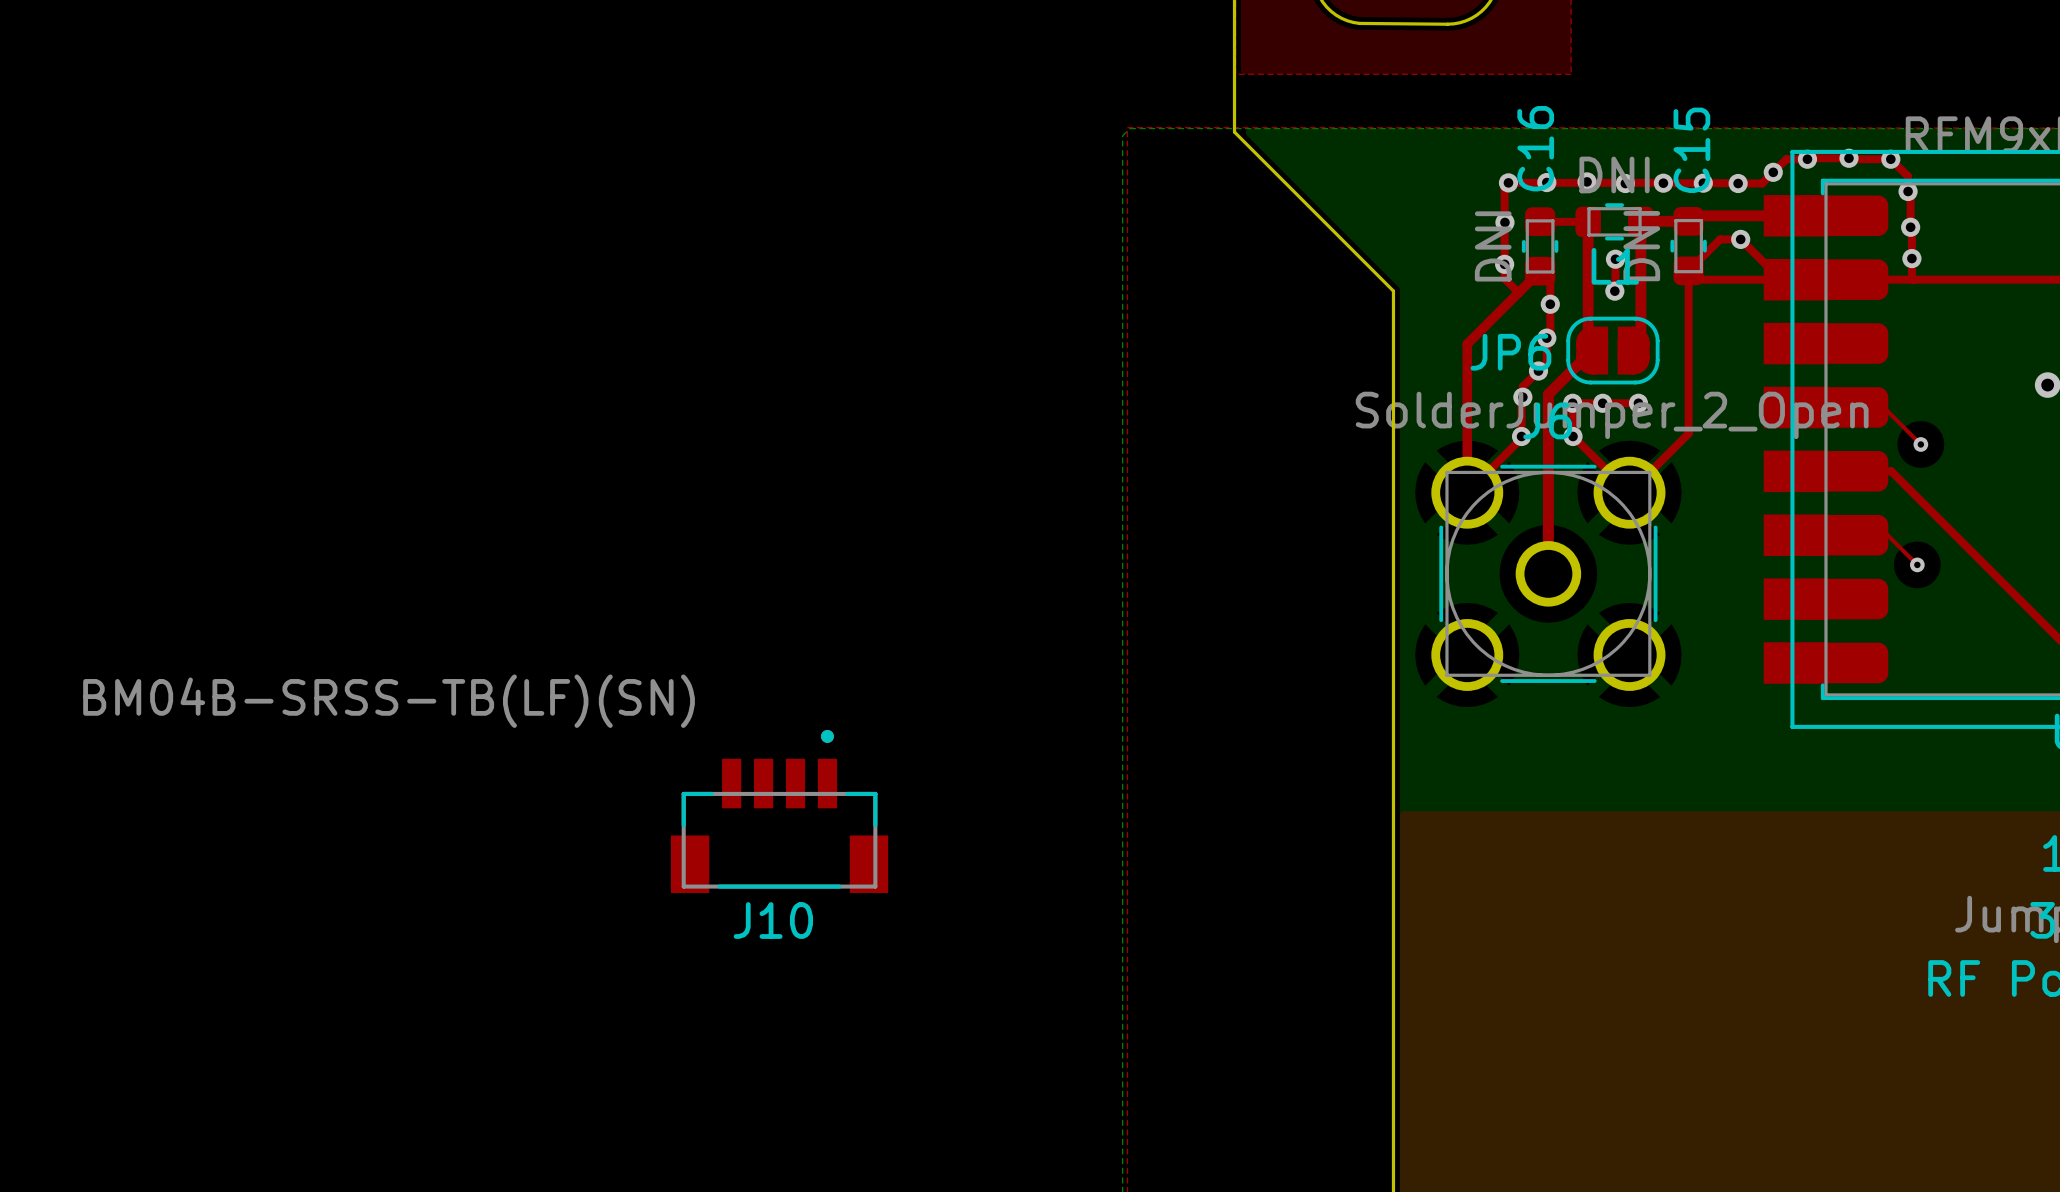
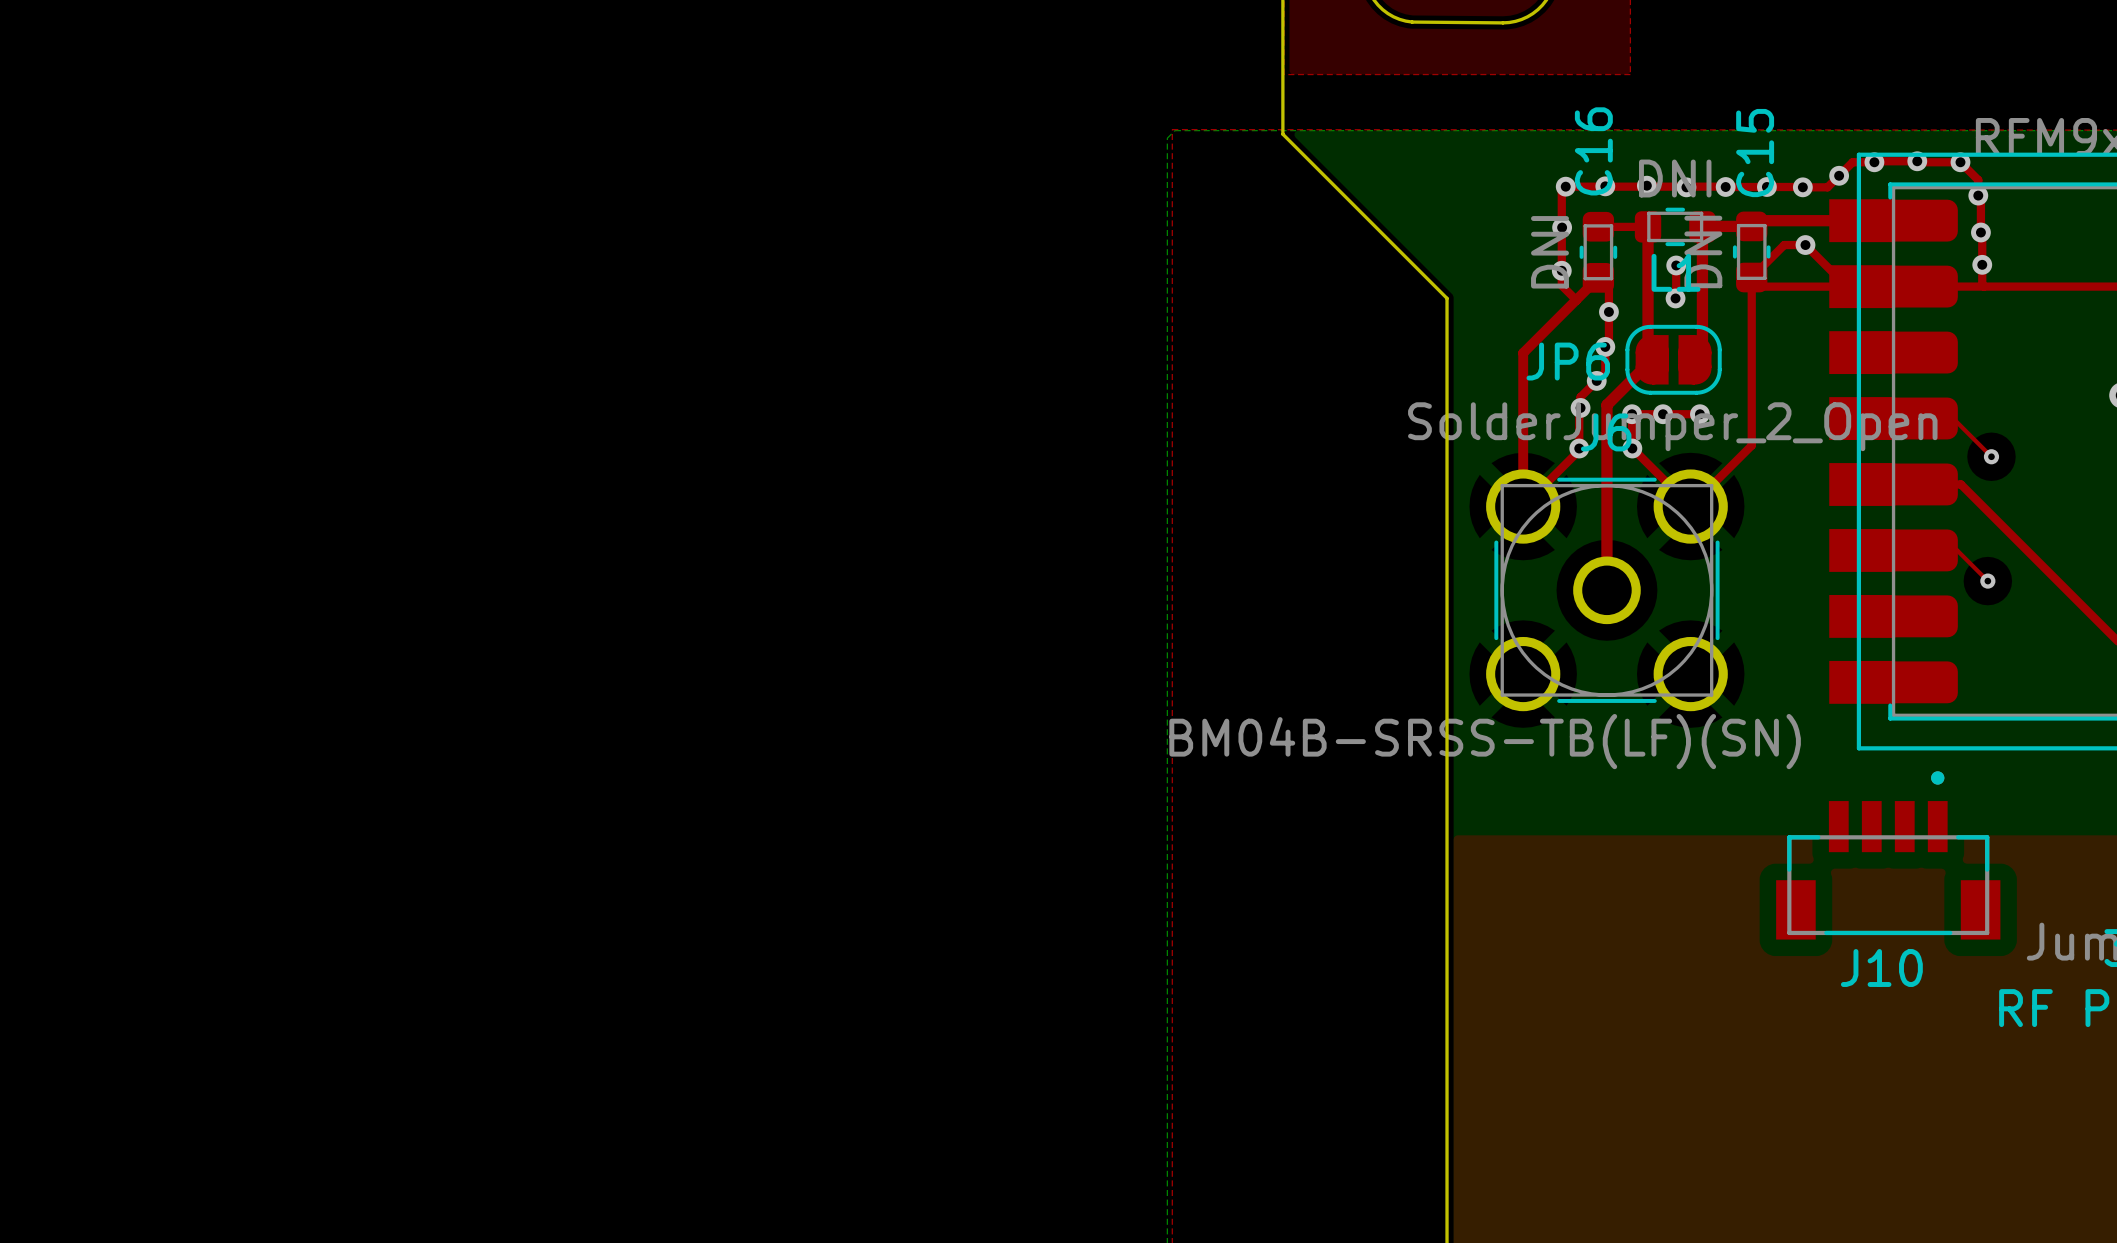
J10 position: (779, 811) -> (1888, 855)

